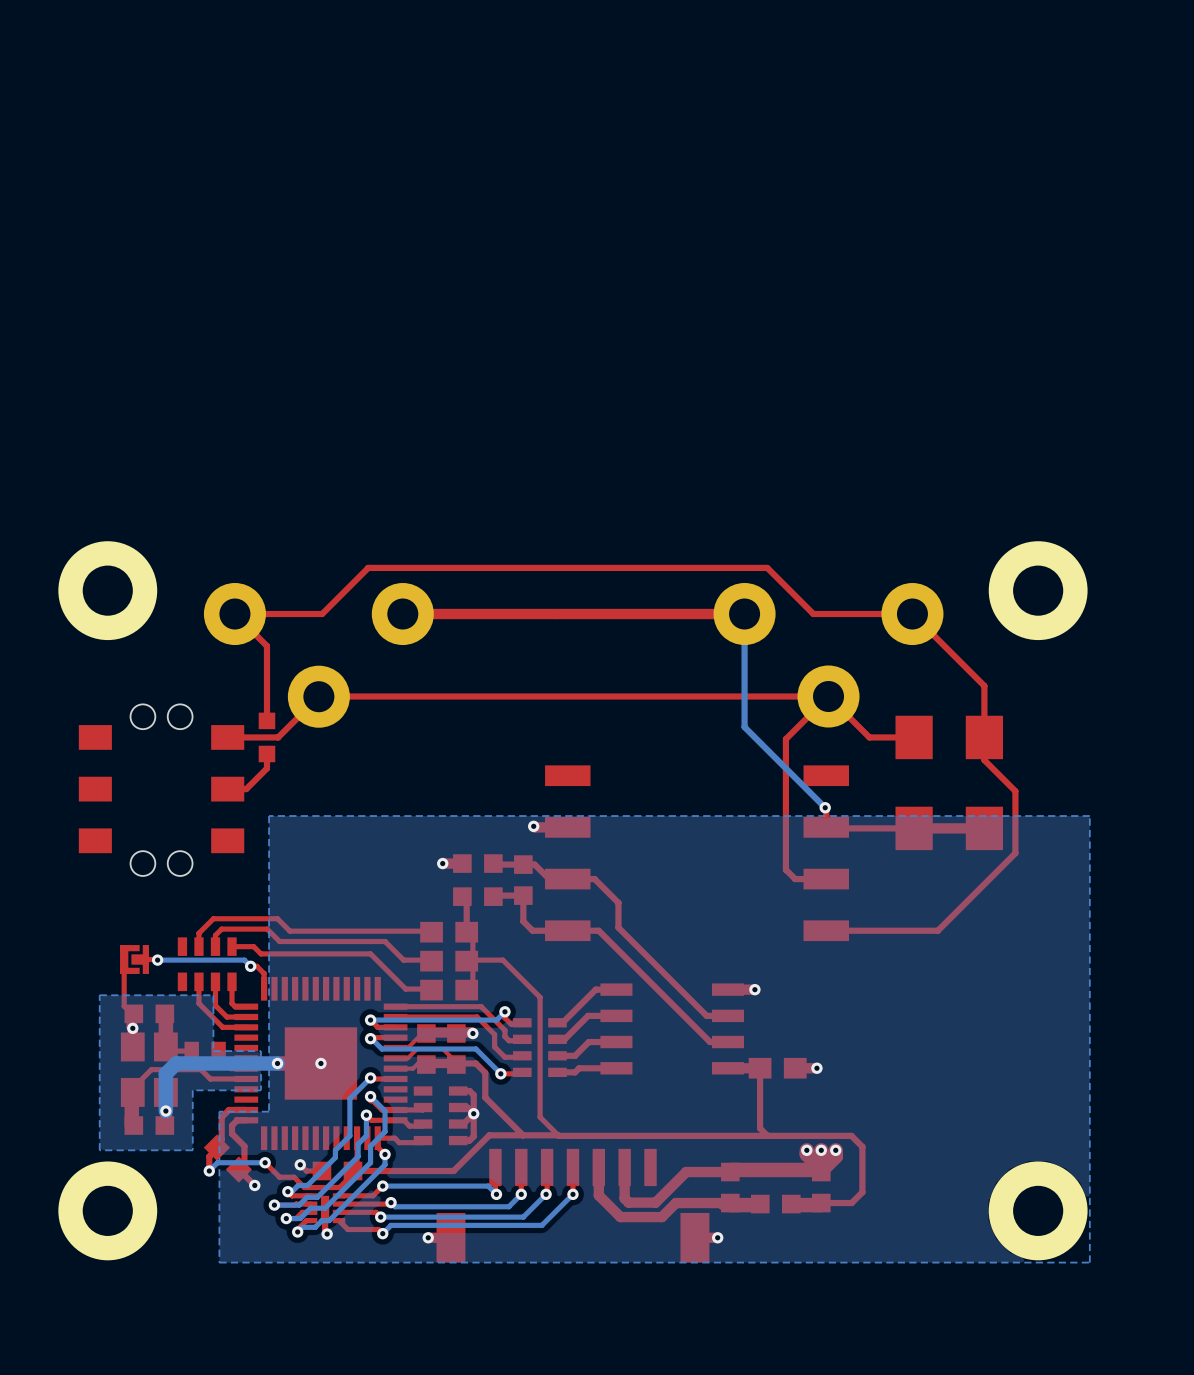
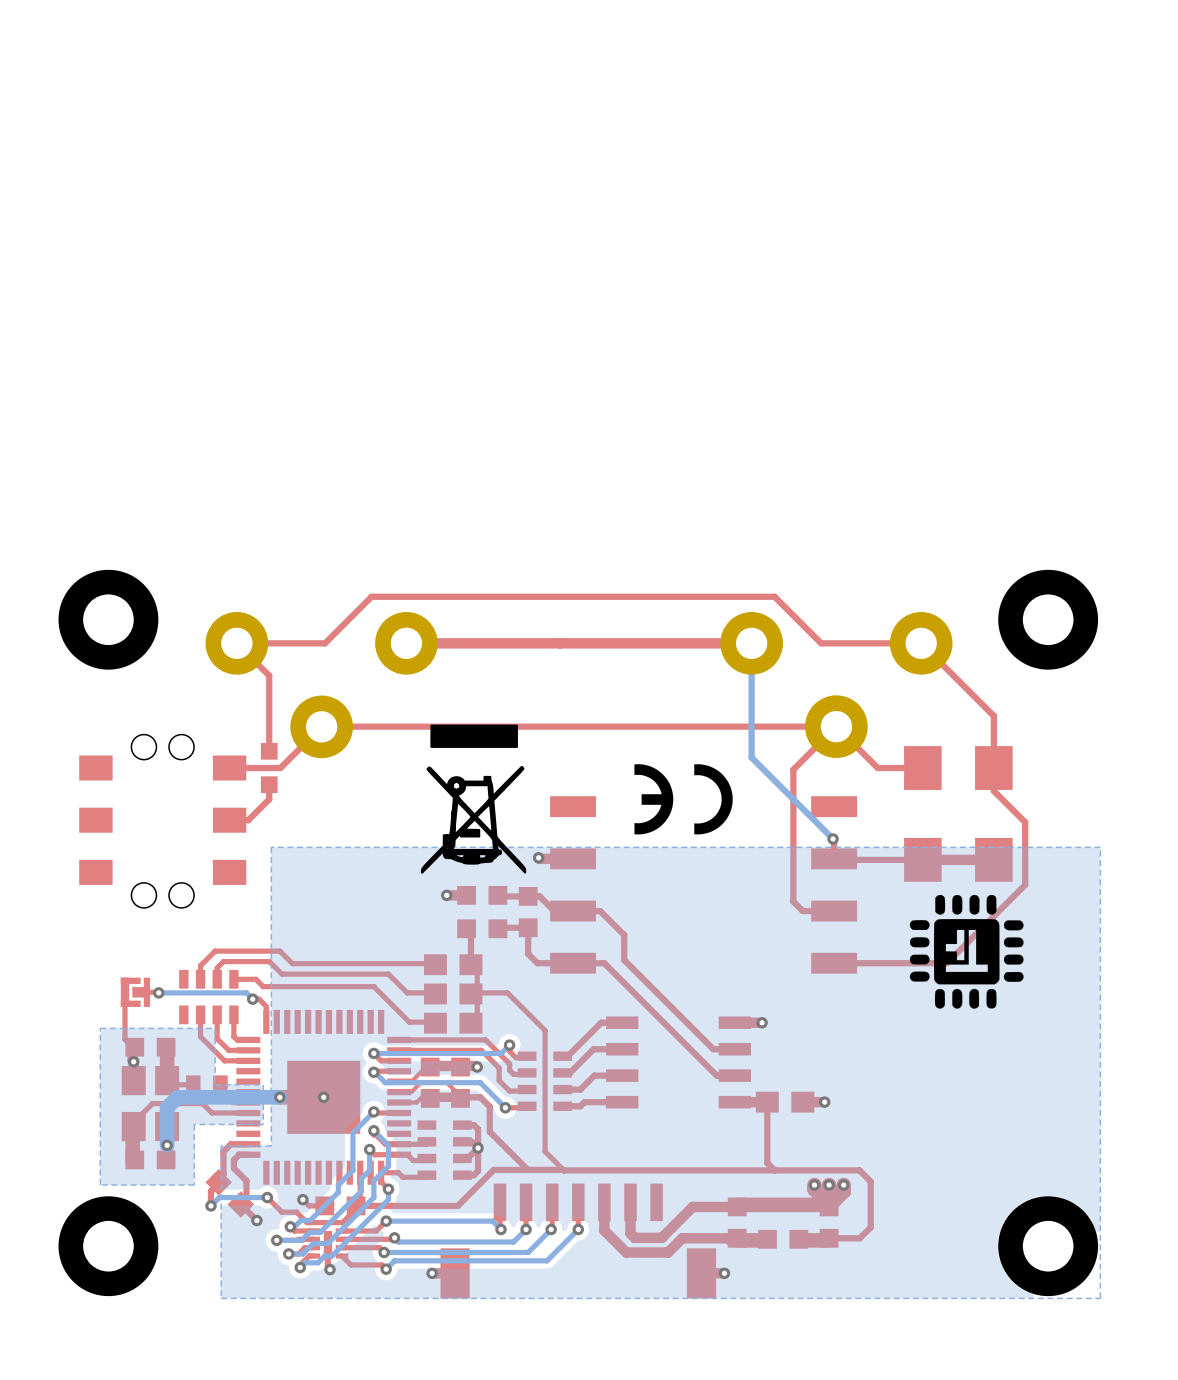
drawing: none -> [420, 724, 527, 874]
drawing: none -> [634, 764, 733, 835]
drawing: none -> [909, 894, 1024, 1009]

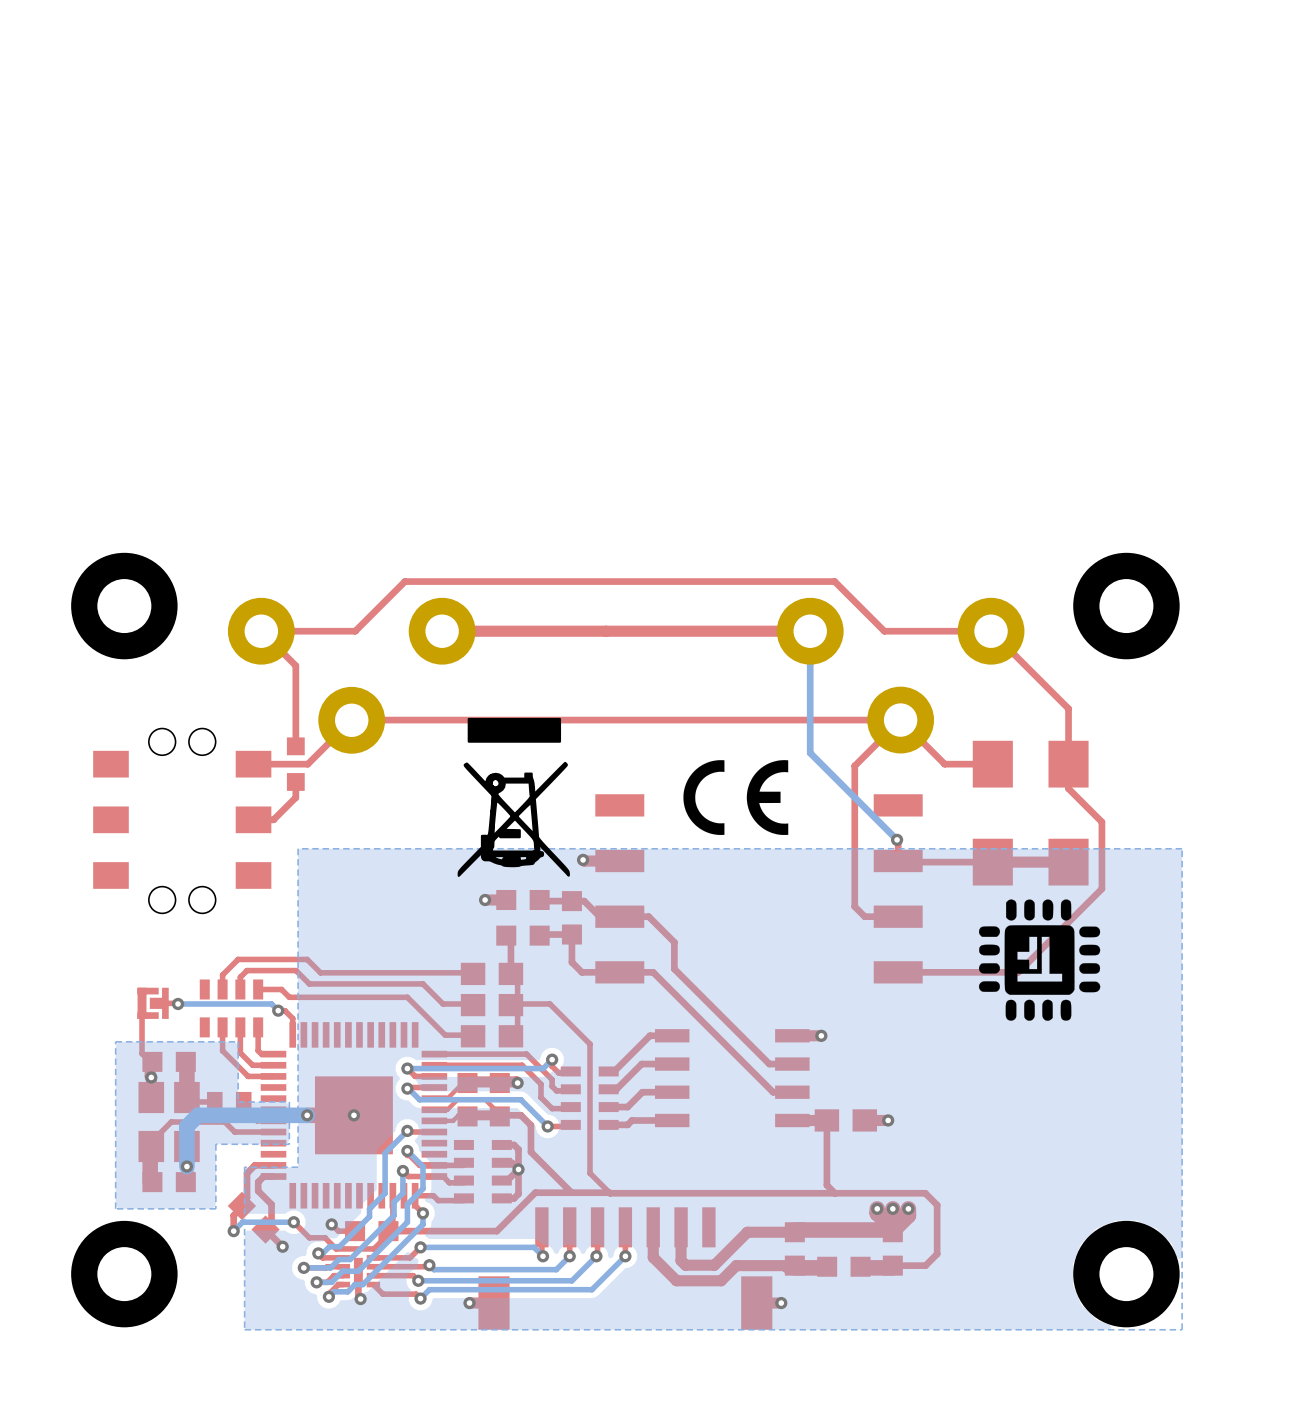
drawing shape: [634, 764, 733, 835] -> [683, 760, 789, 835]

